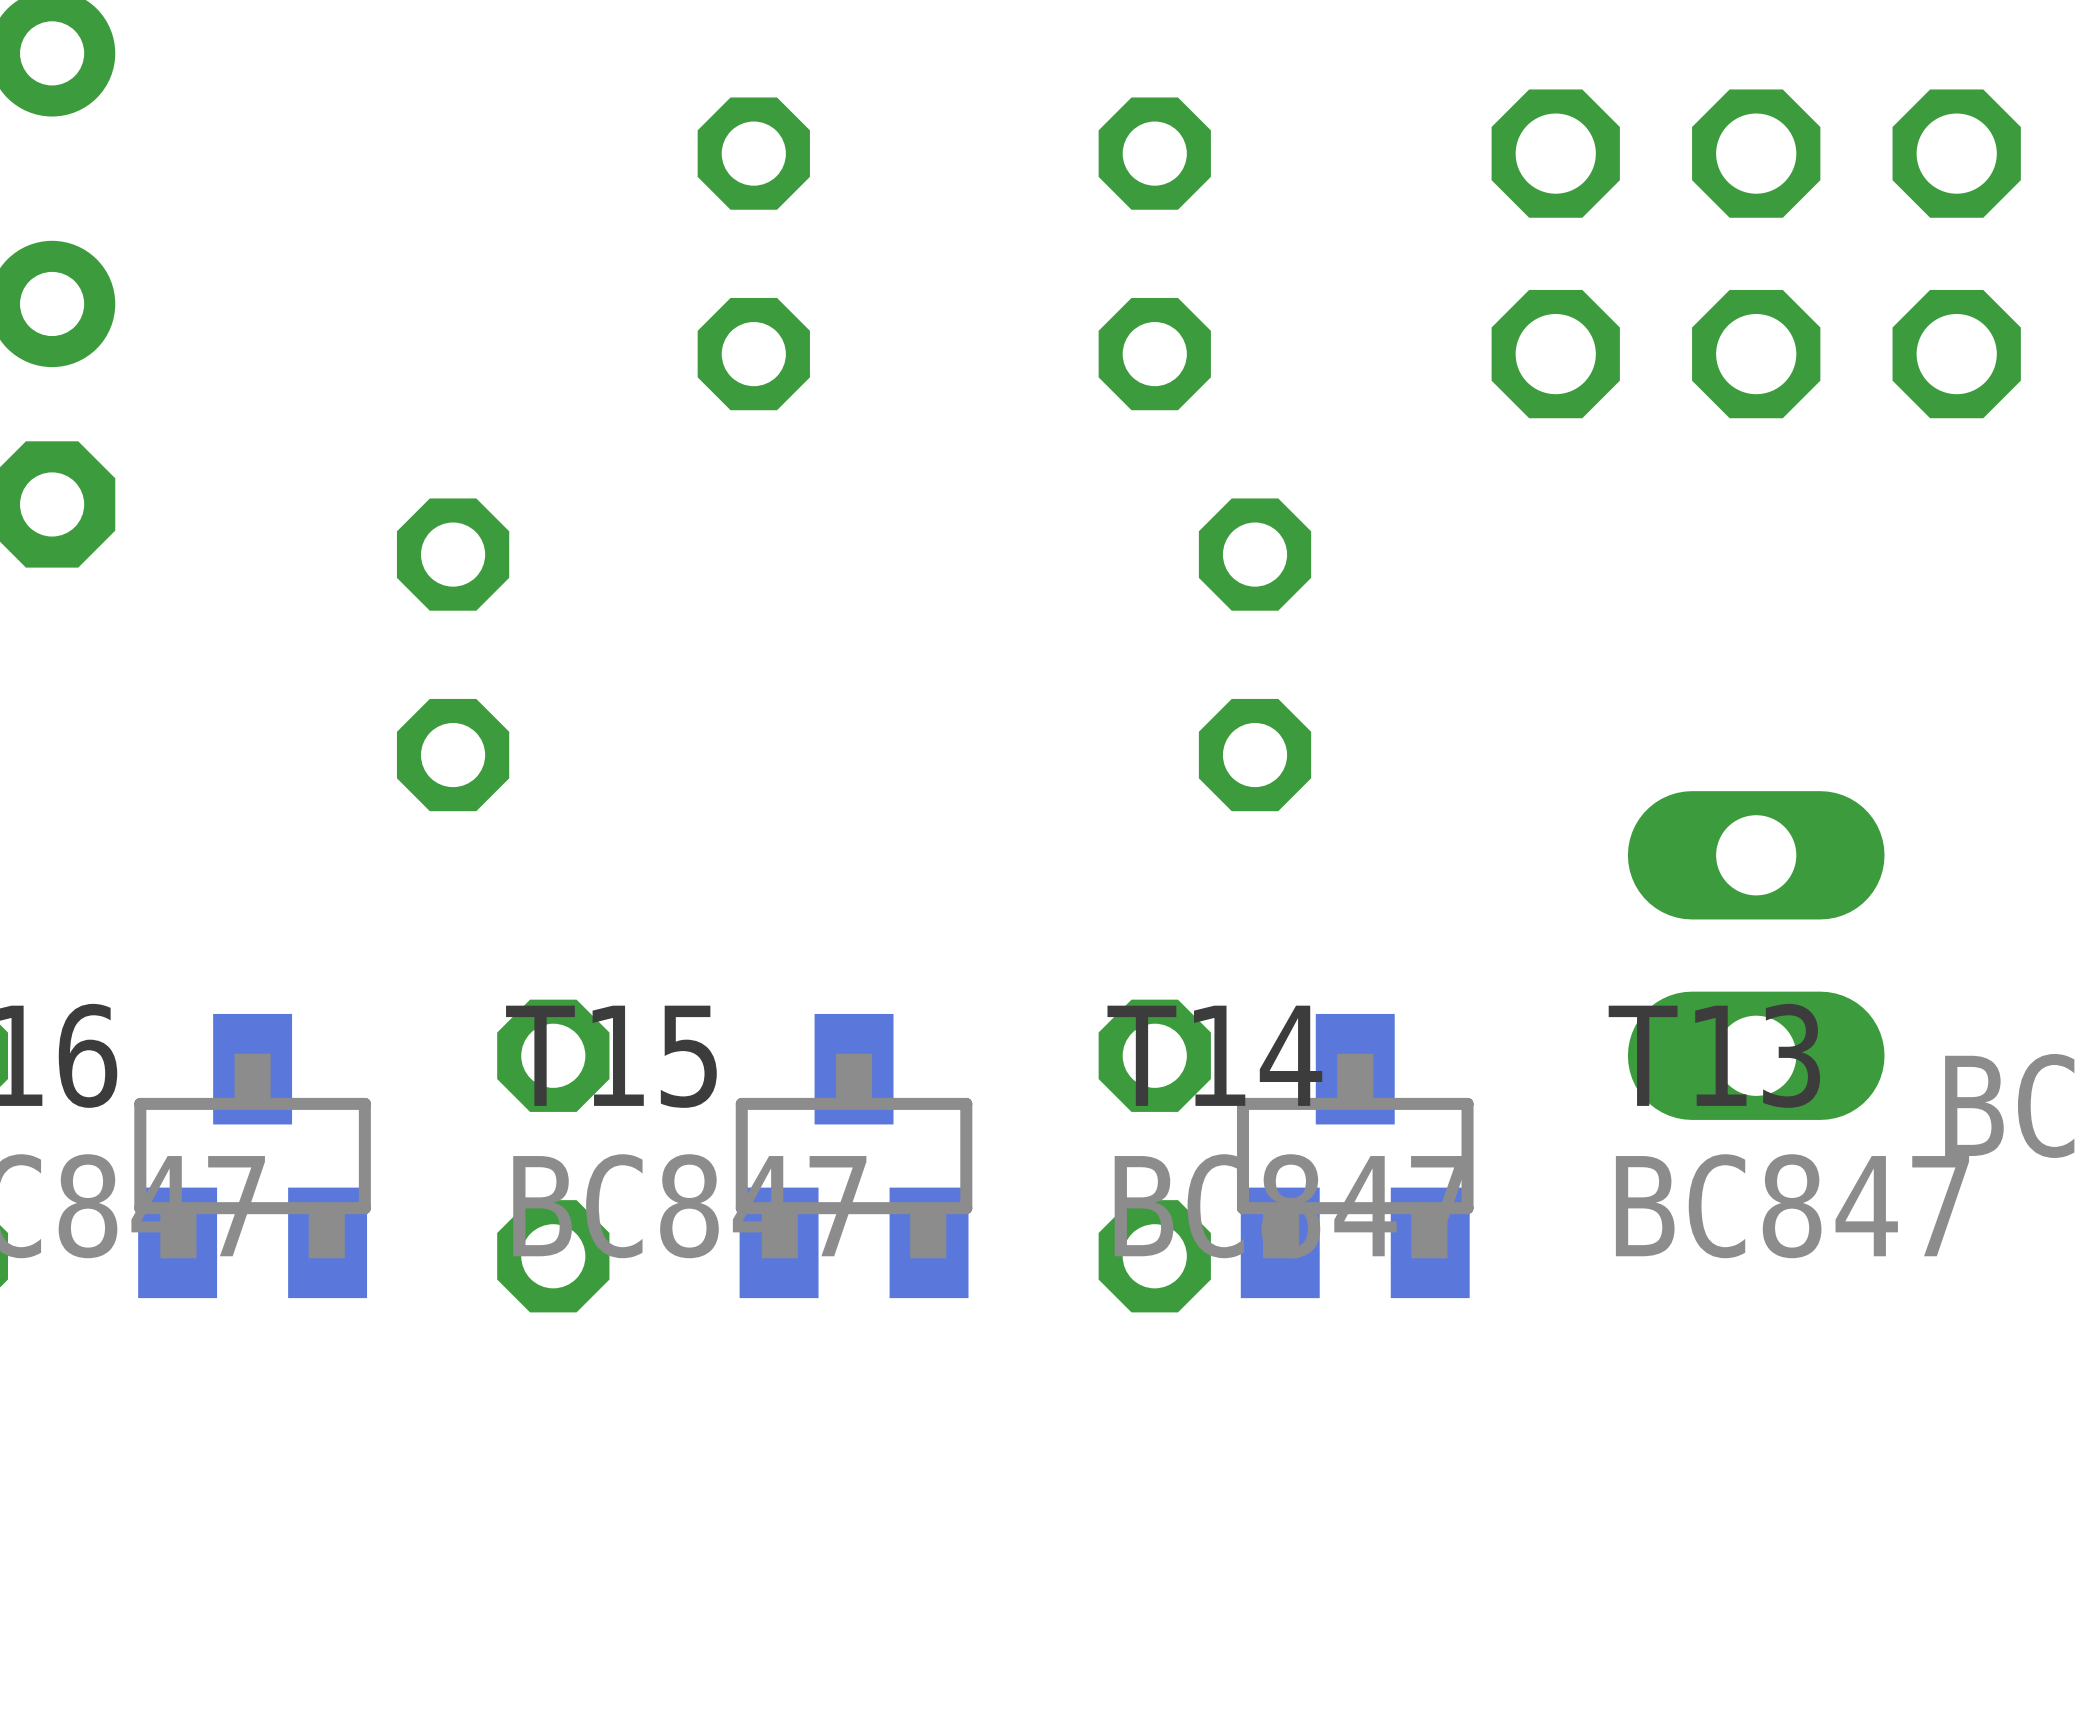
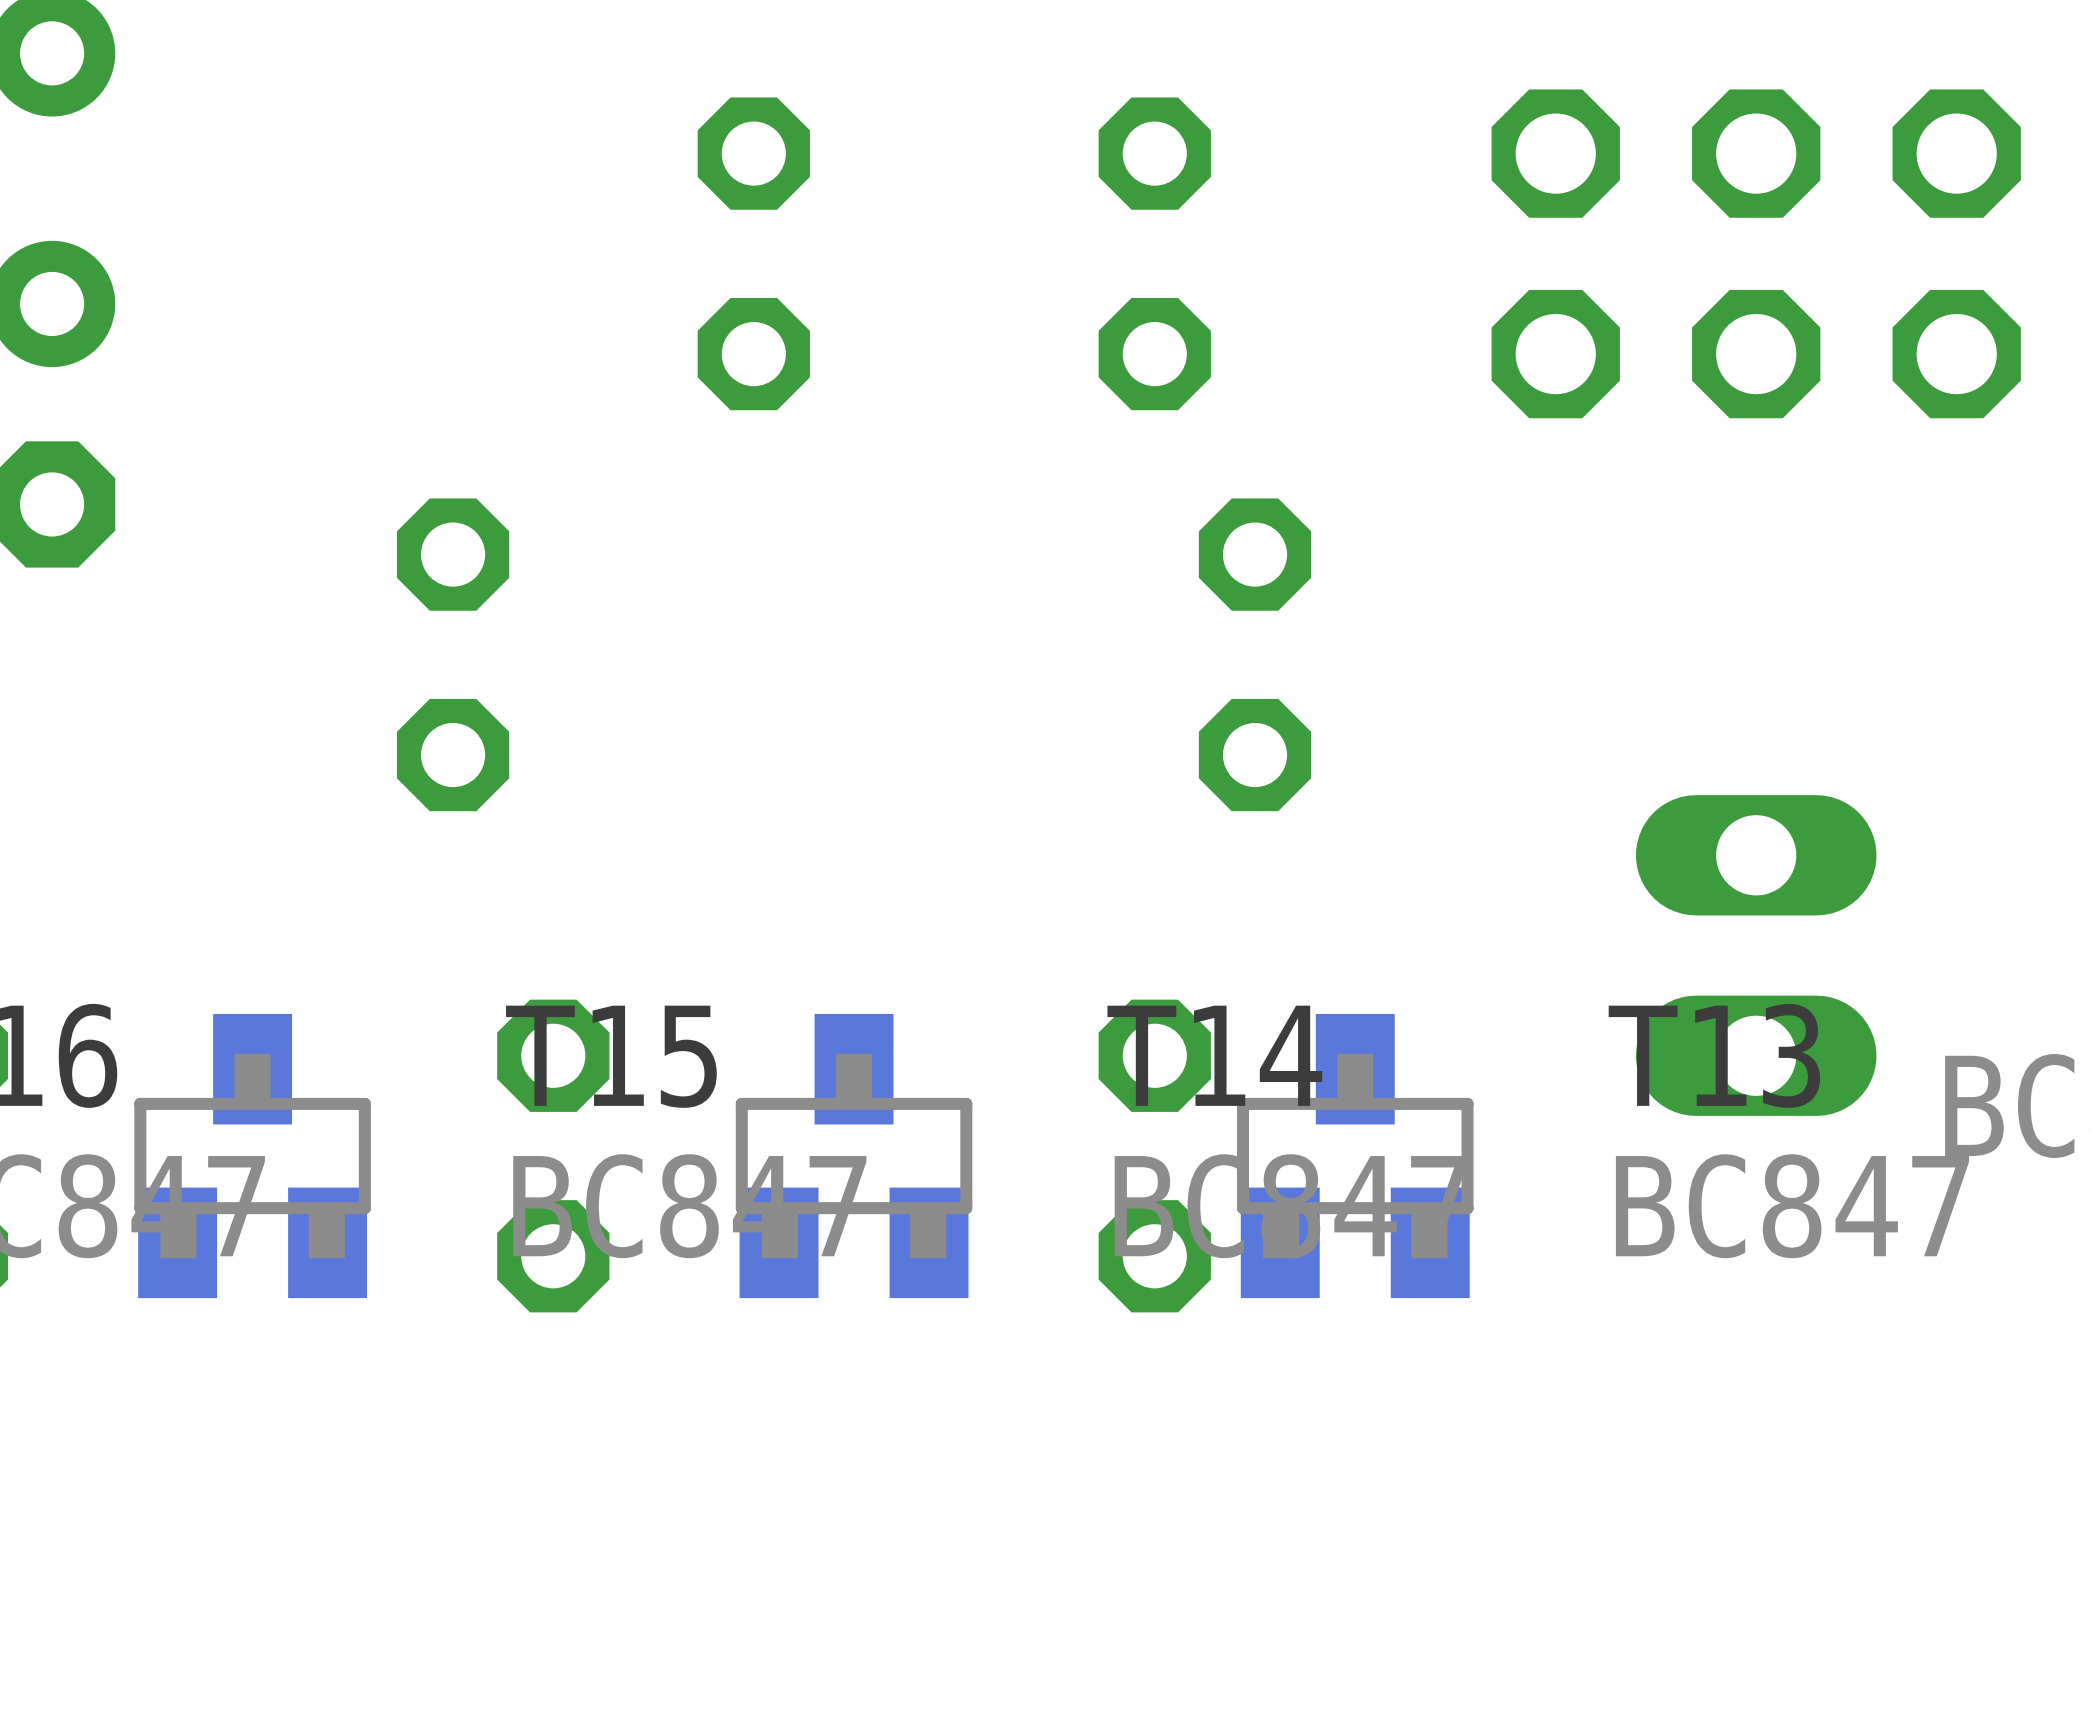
part footprint: [1627, 791, 1885, 1120] -> [1635, 795, 1877, 1116]

